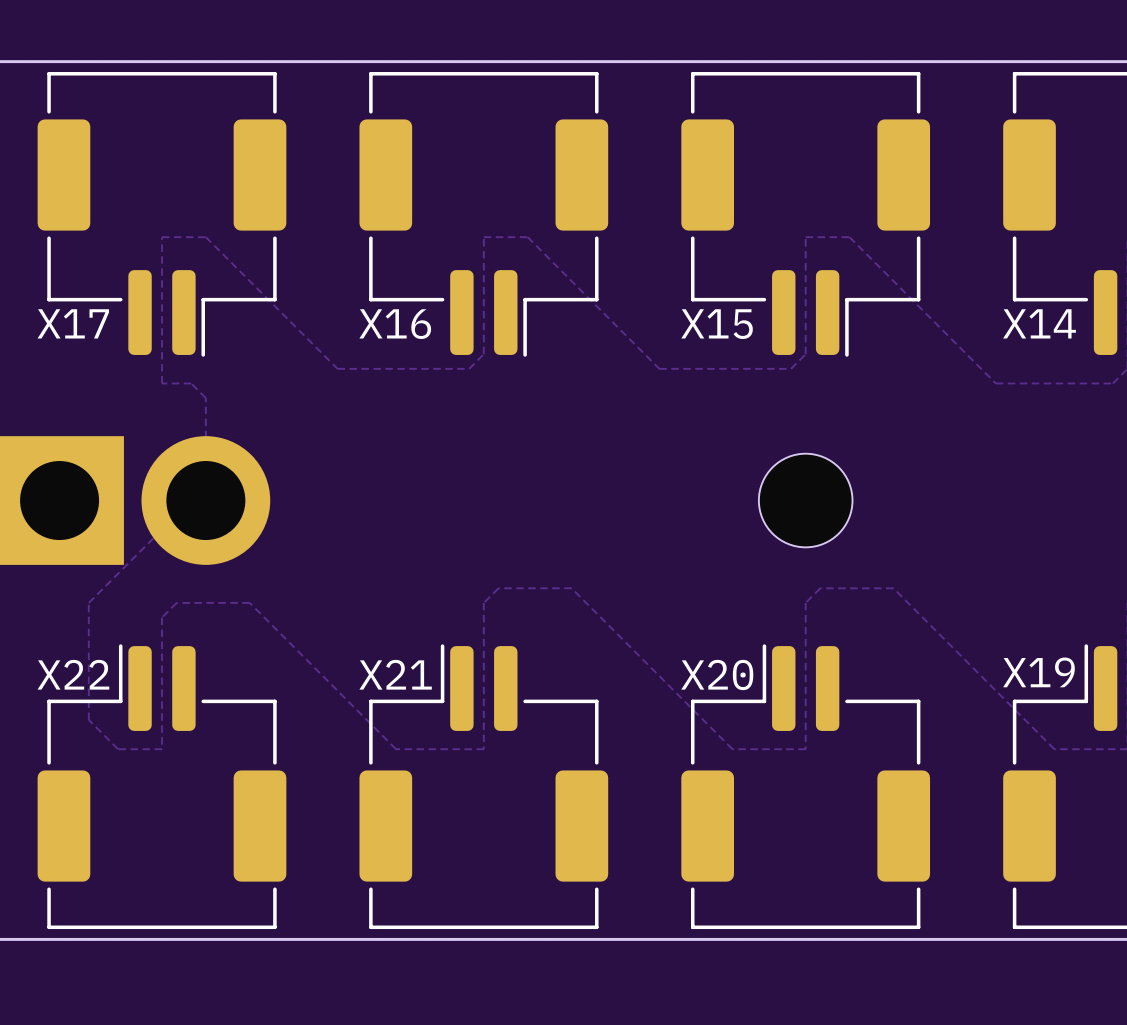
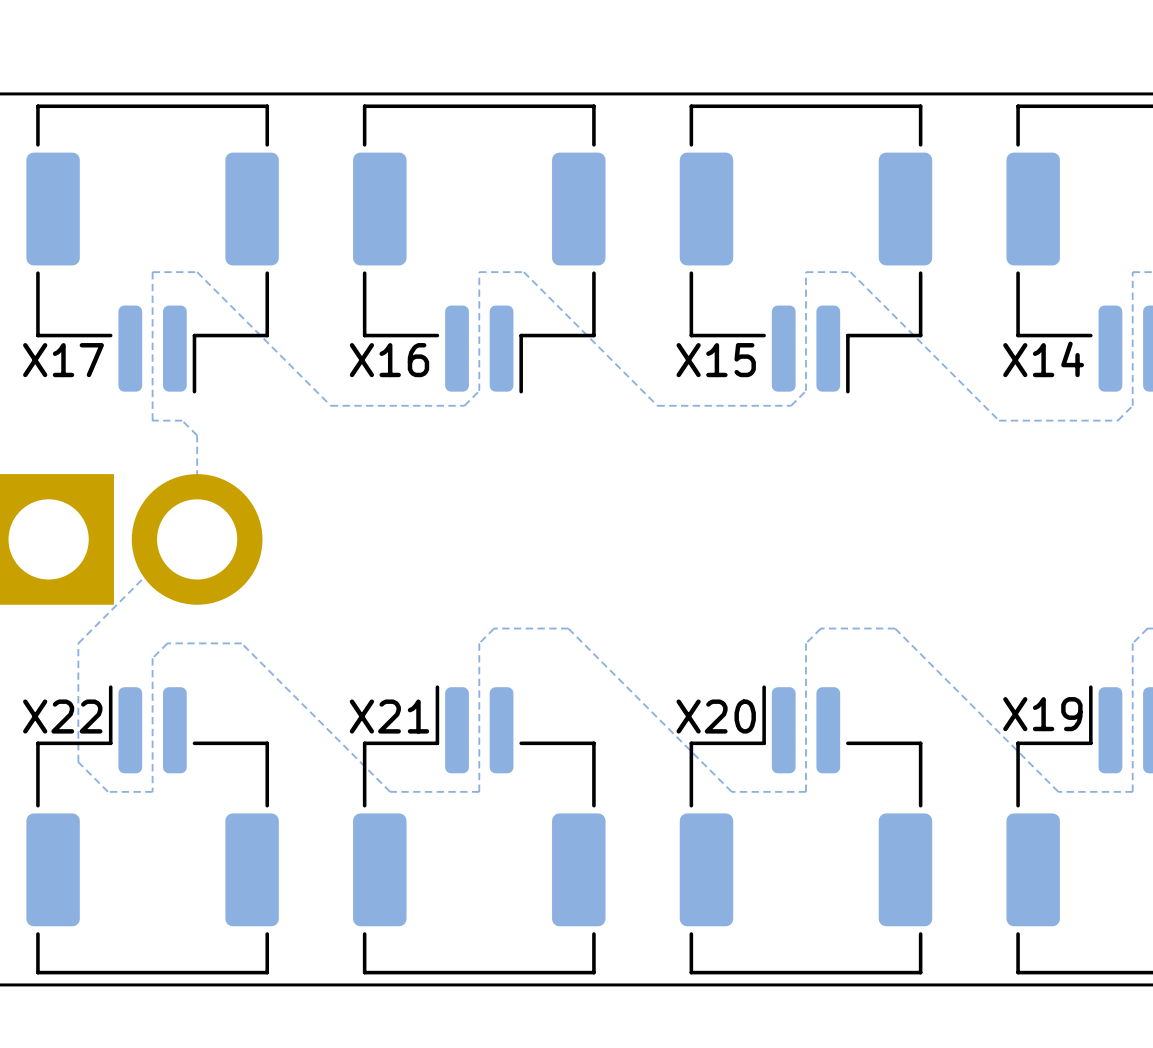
part: (805, 500) -> none

